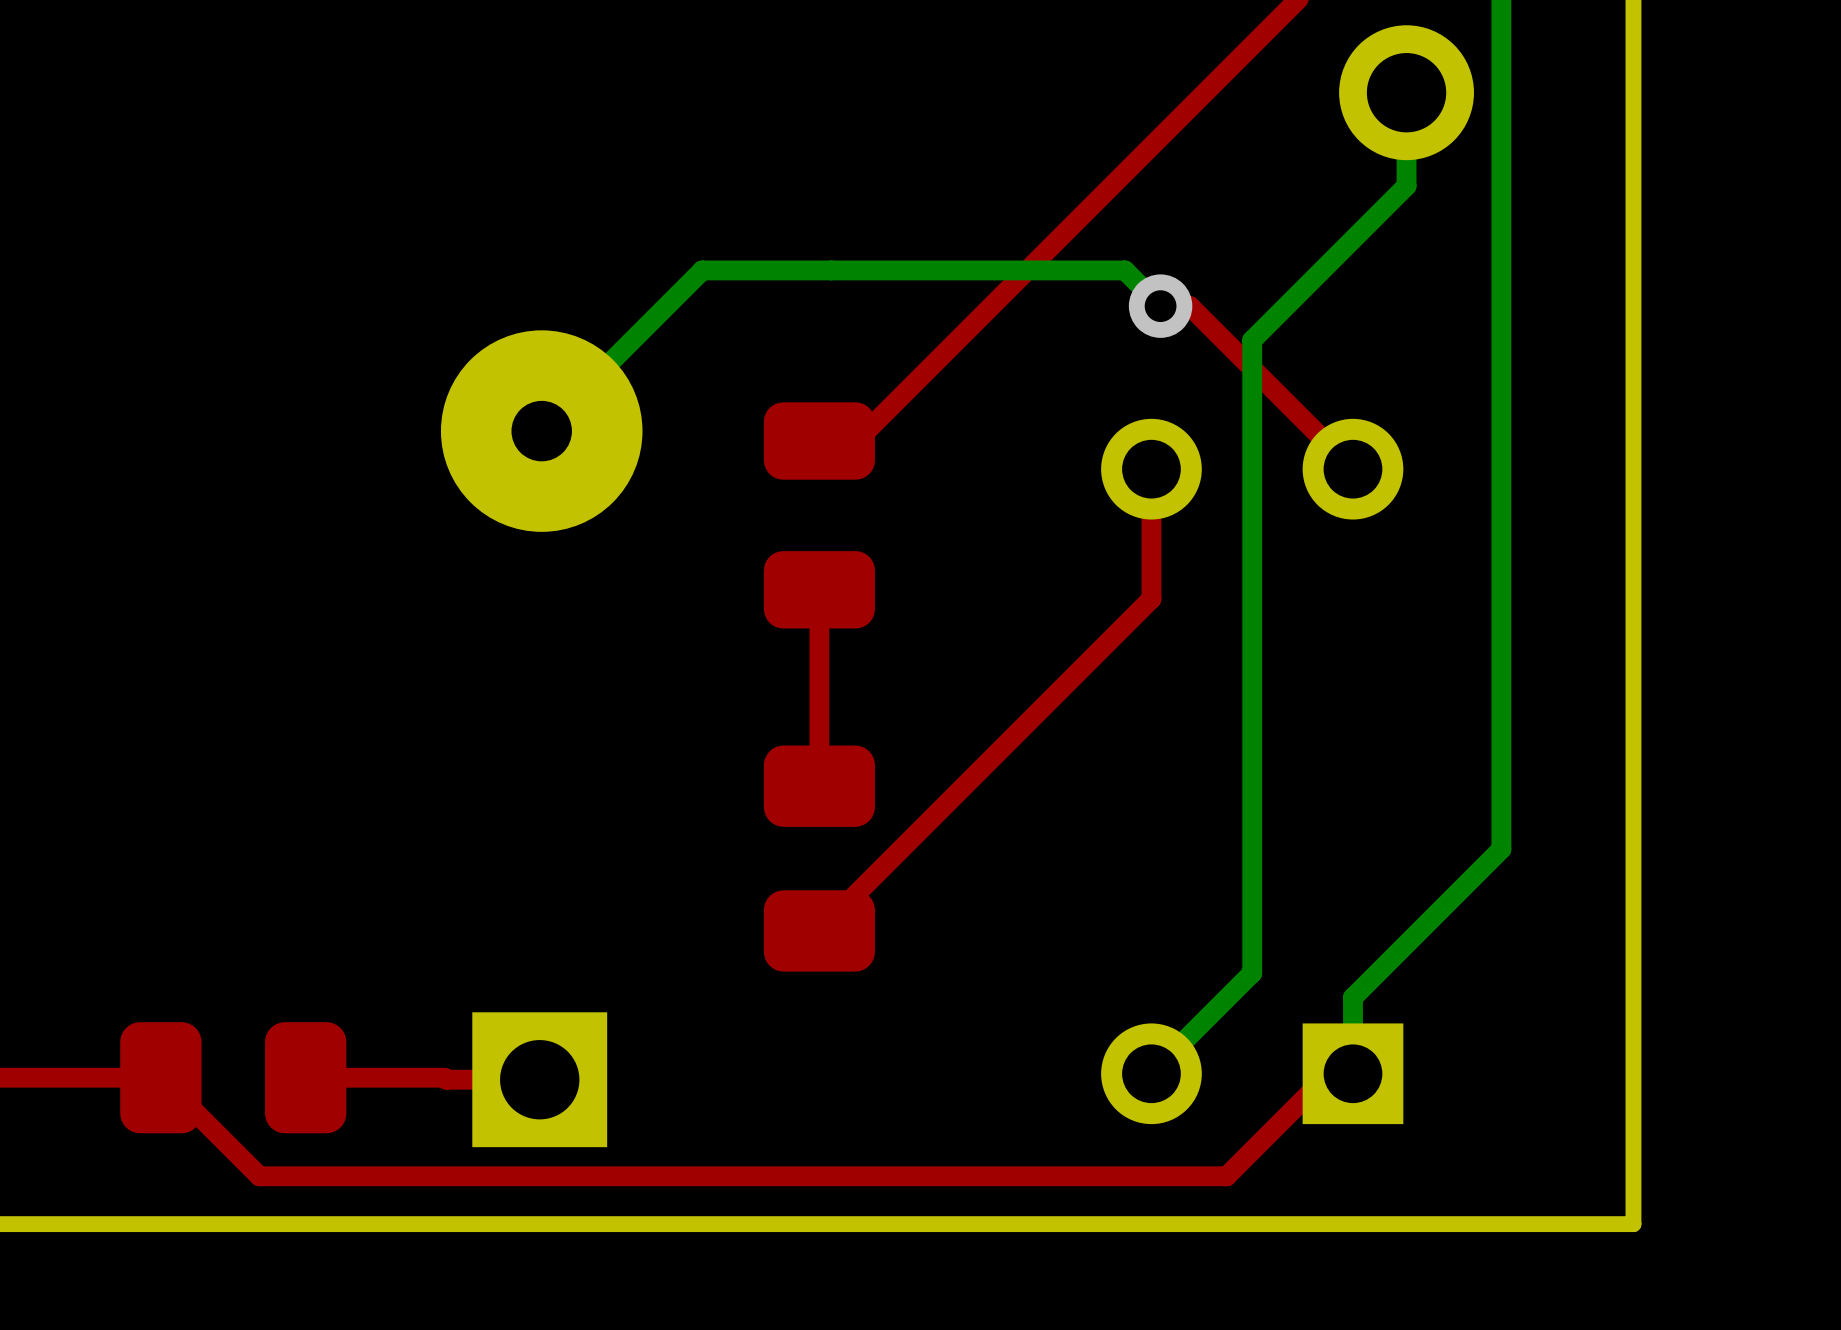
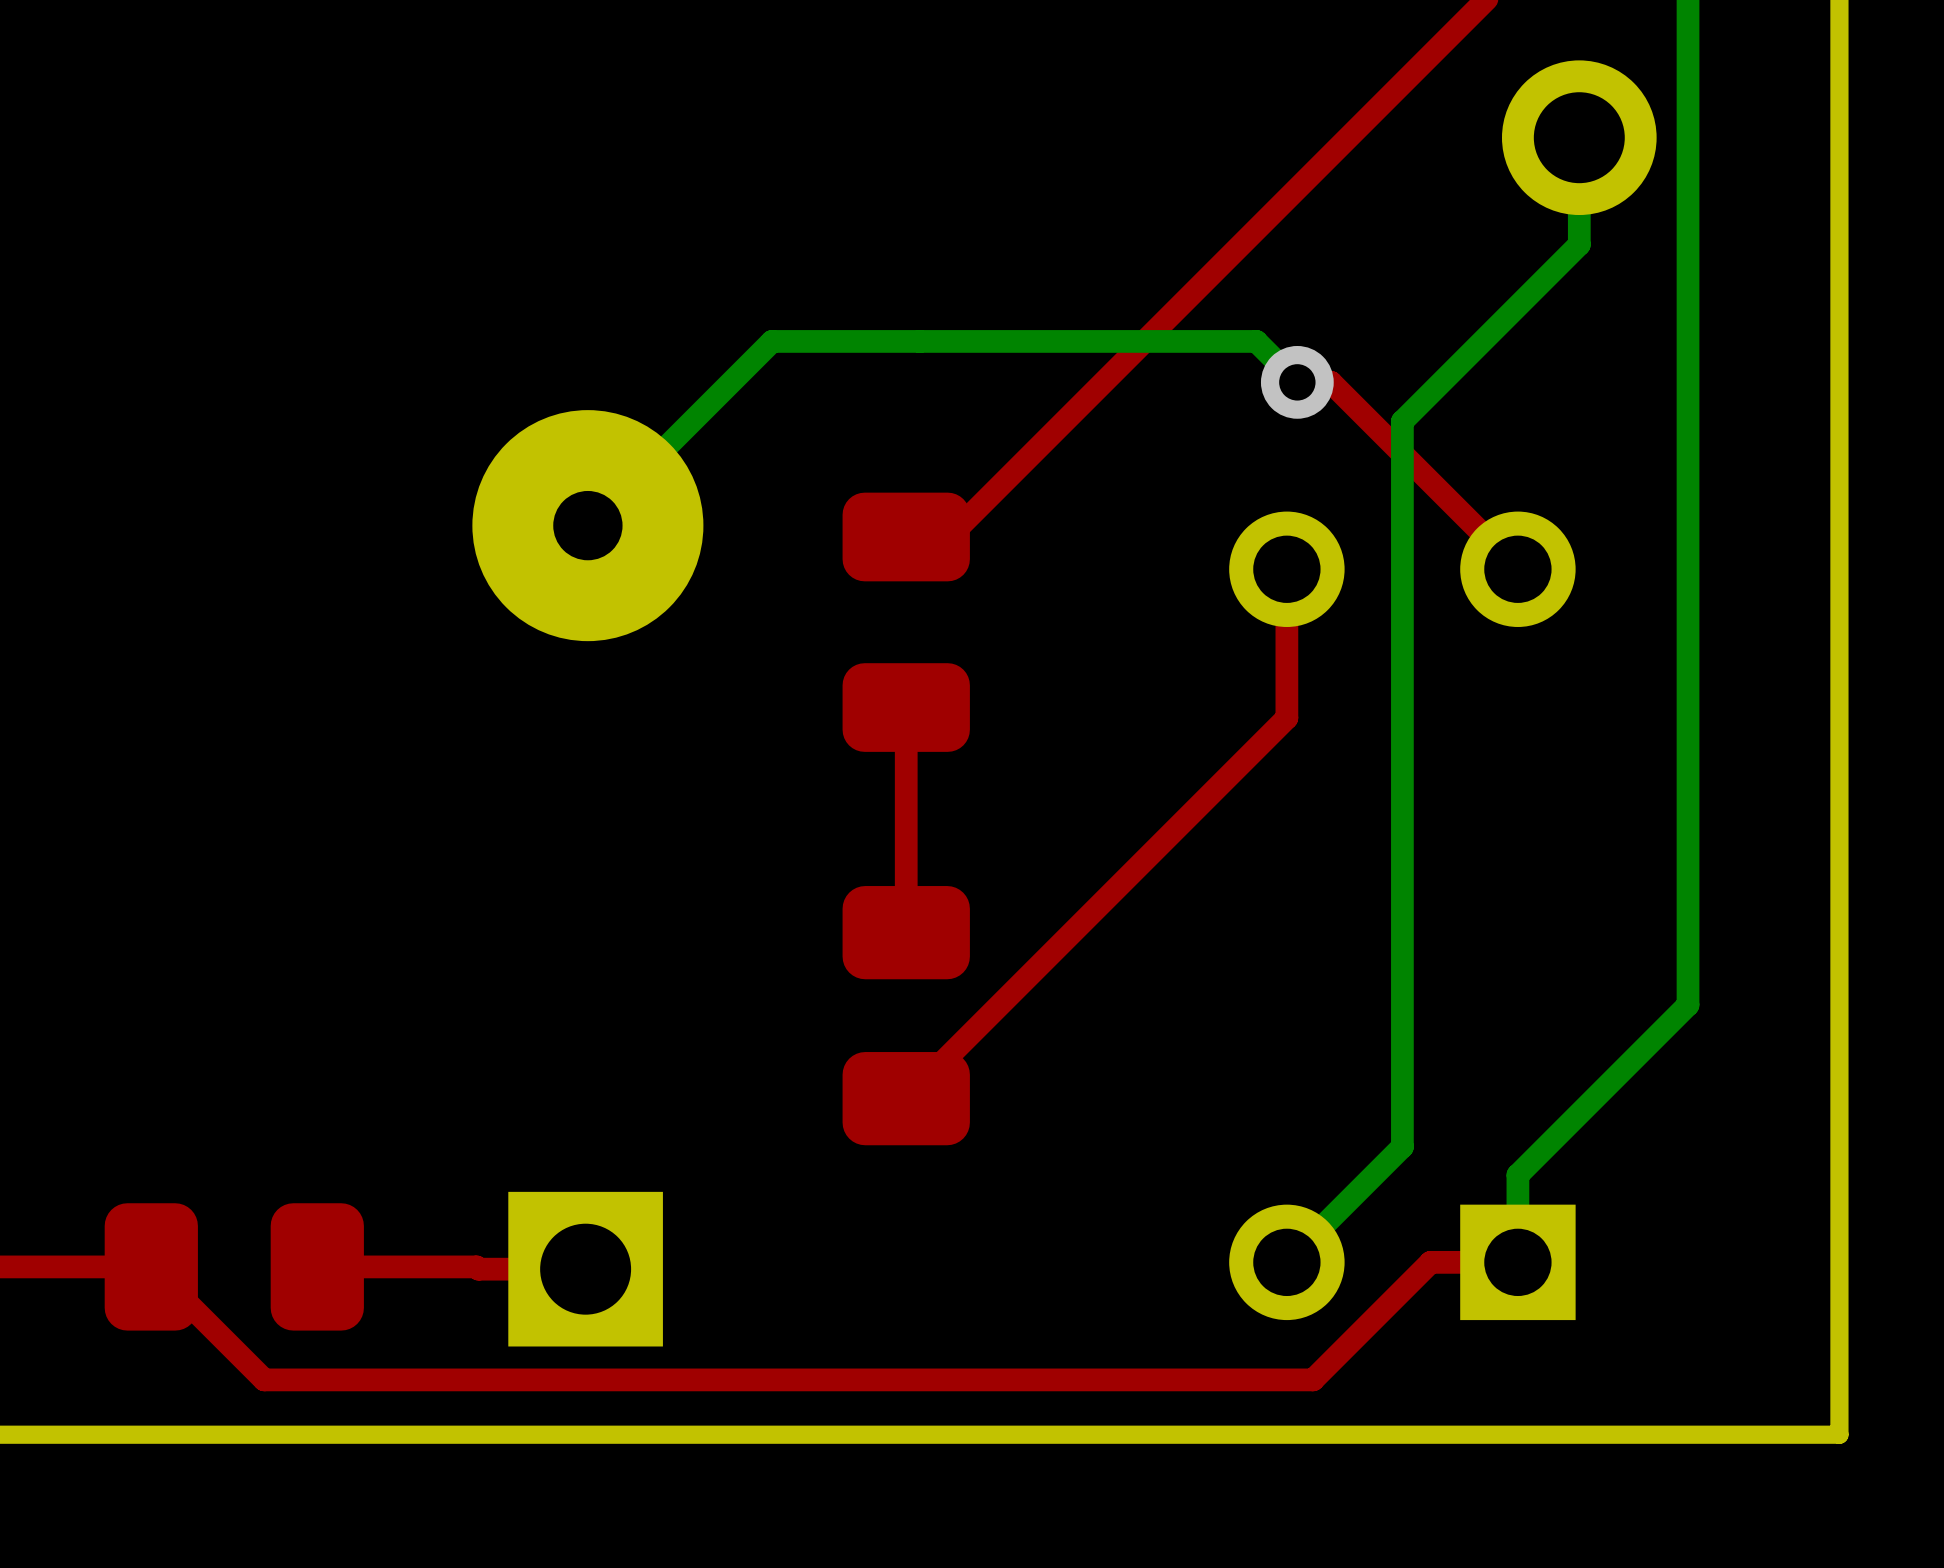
top track: (1329, 1073) (1226, 1176) (1174, 1176) -> (1490, 1262) (1430, 1262) (1313, 1379)

